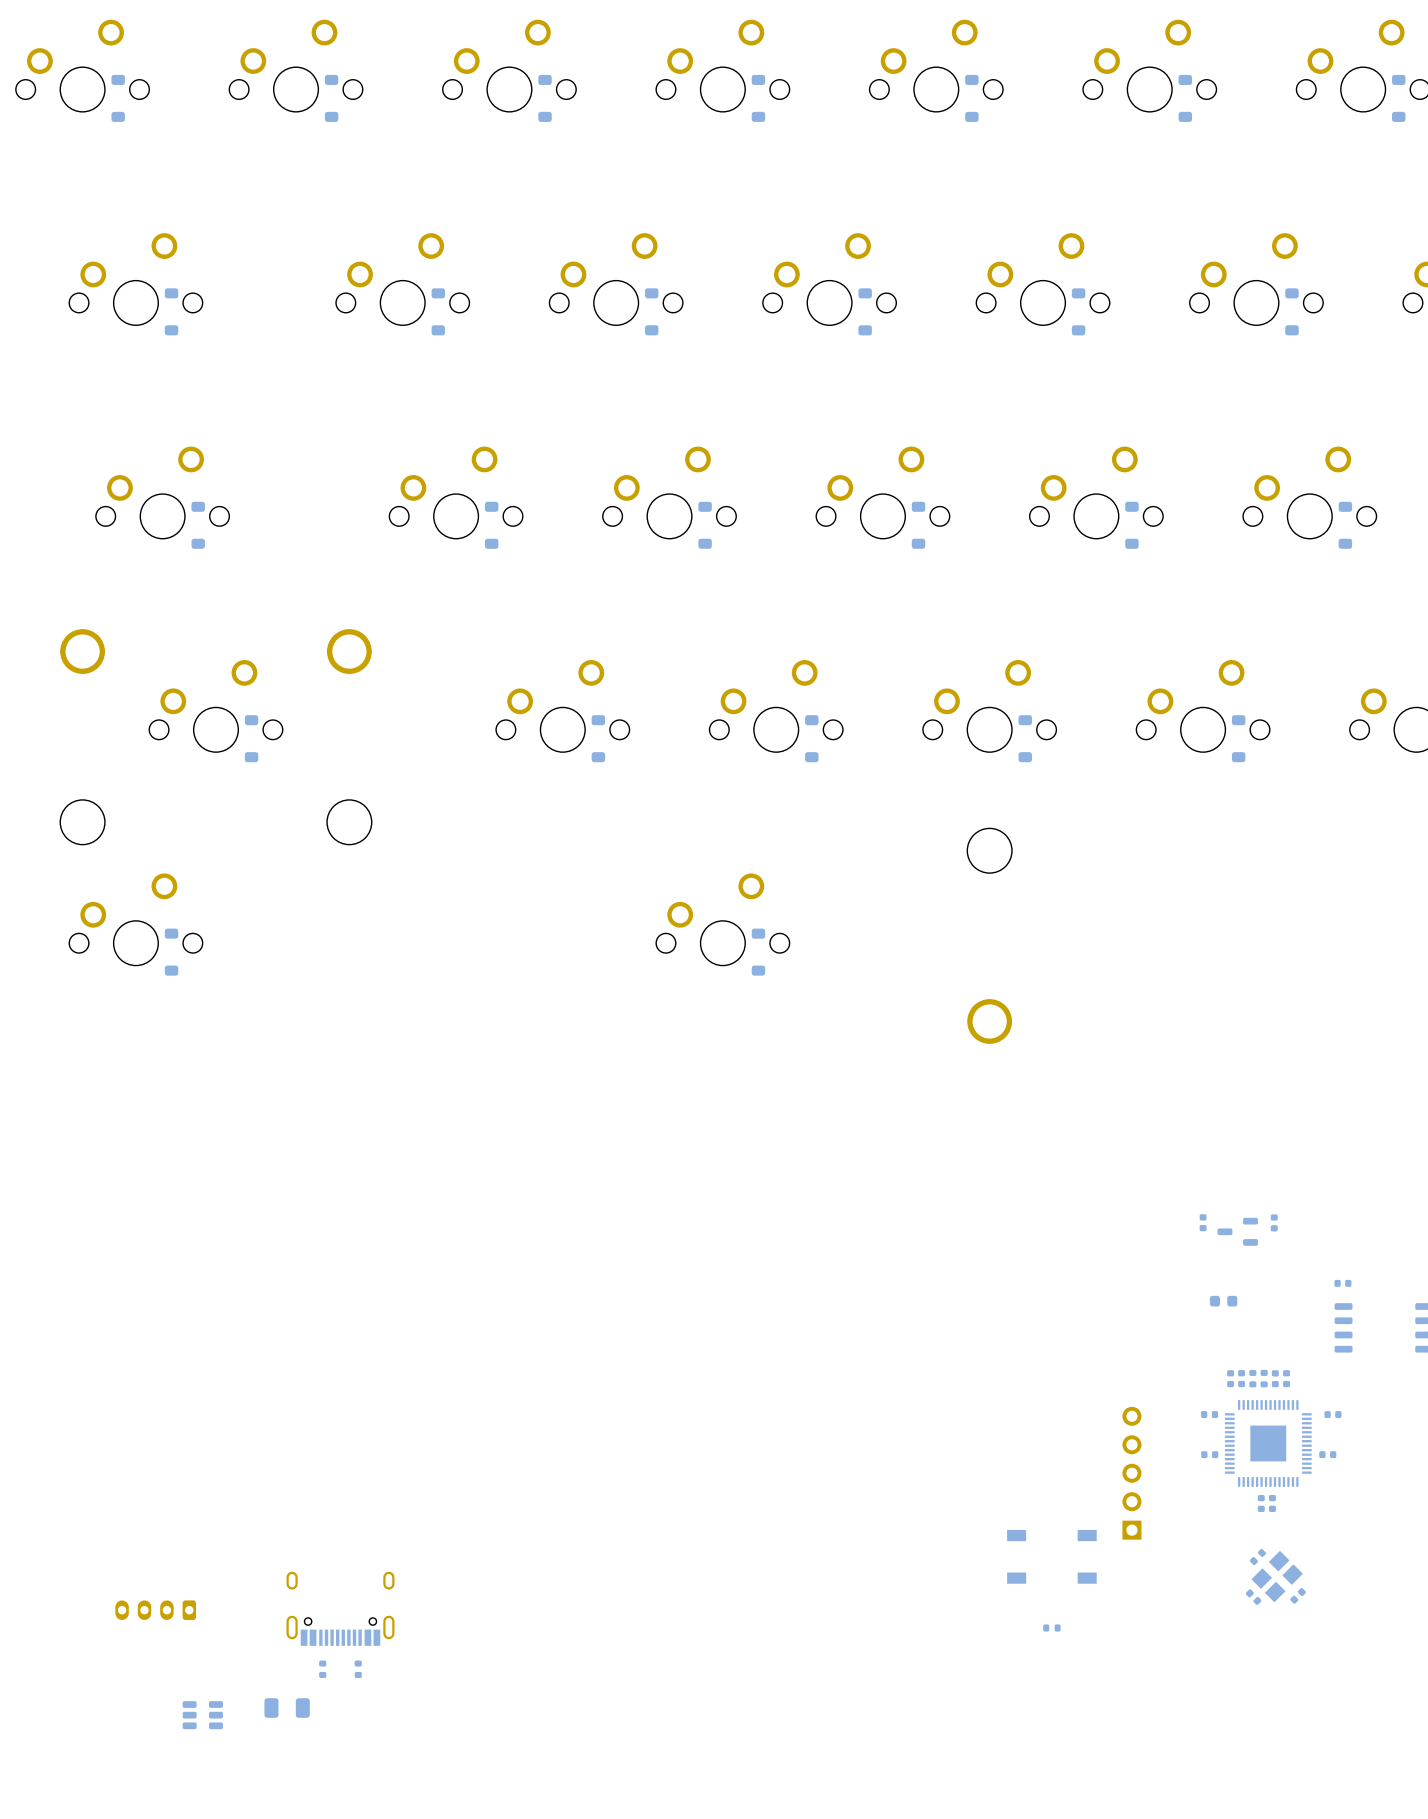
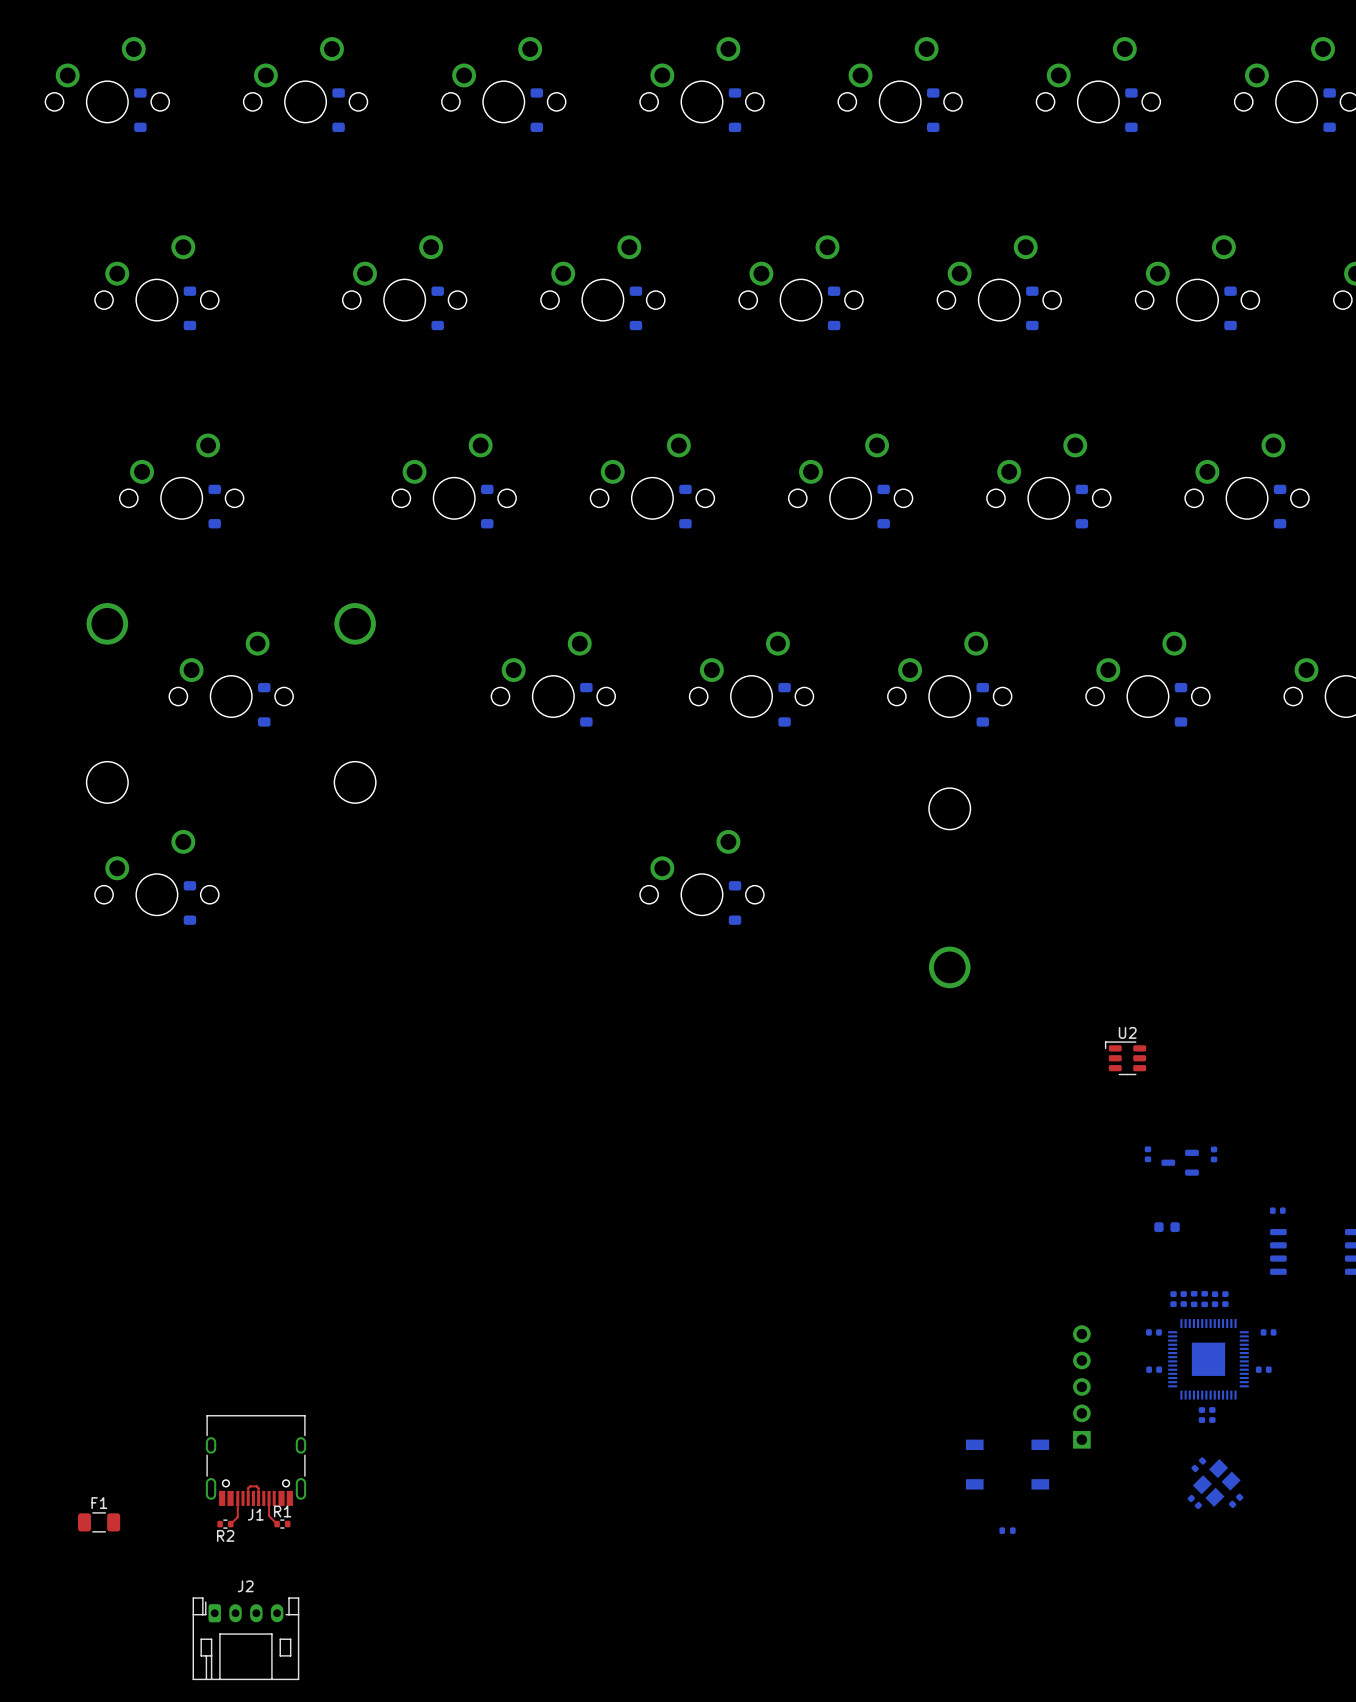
U2: none -> (1125, 1058)
top track: none -> (237, 1498) (237, 1517) (230, 1524)
top track: none -> (248, 1498) (248, 1488) (250, 1486) (258, 1488) (258, 1498)
top track: none -> (269, 1498) (269, 1516) (277, 1524)
J1 side: bottom (340, 1608) -> top (256, 1460)
J2 side: bottom (155, 1610) -> top (245, 1638)
R1 side: bottom (322, 1669) -> top (282, 1524)
R2 side: bottom (358, 1669) -> top (225, 1524)
F1 side: bottom (287, 1708) -> top (99, 1522)
part: (202, 1715) -> none

